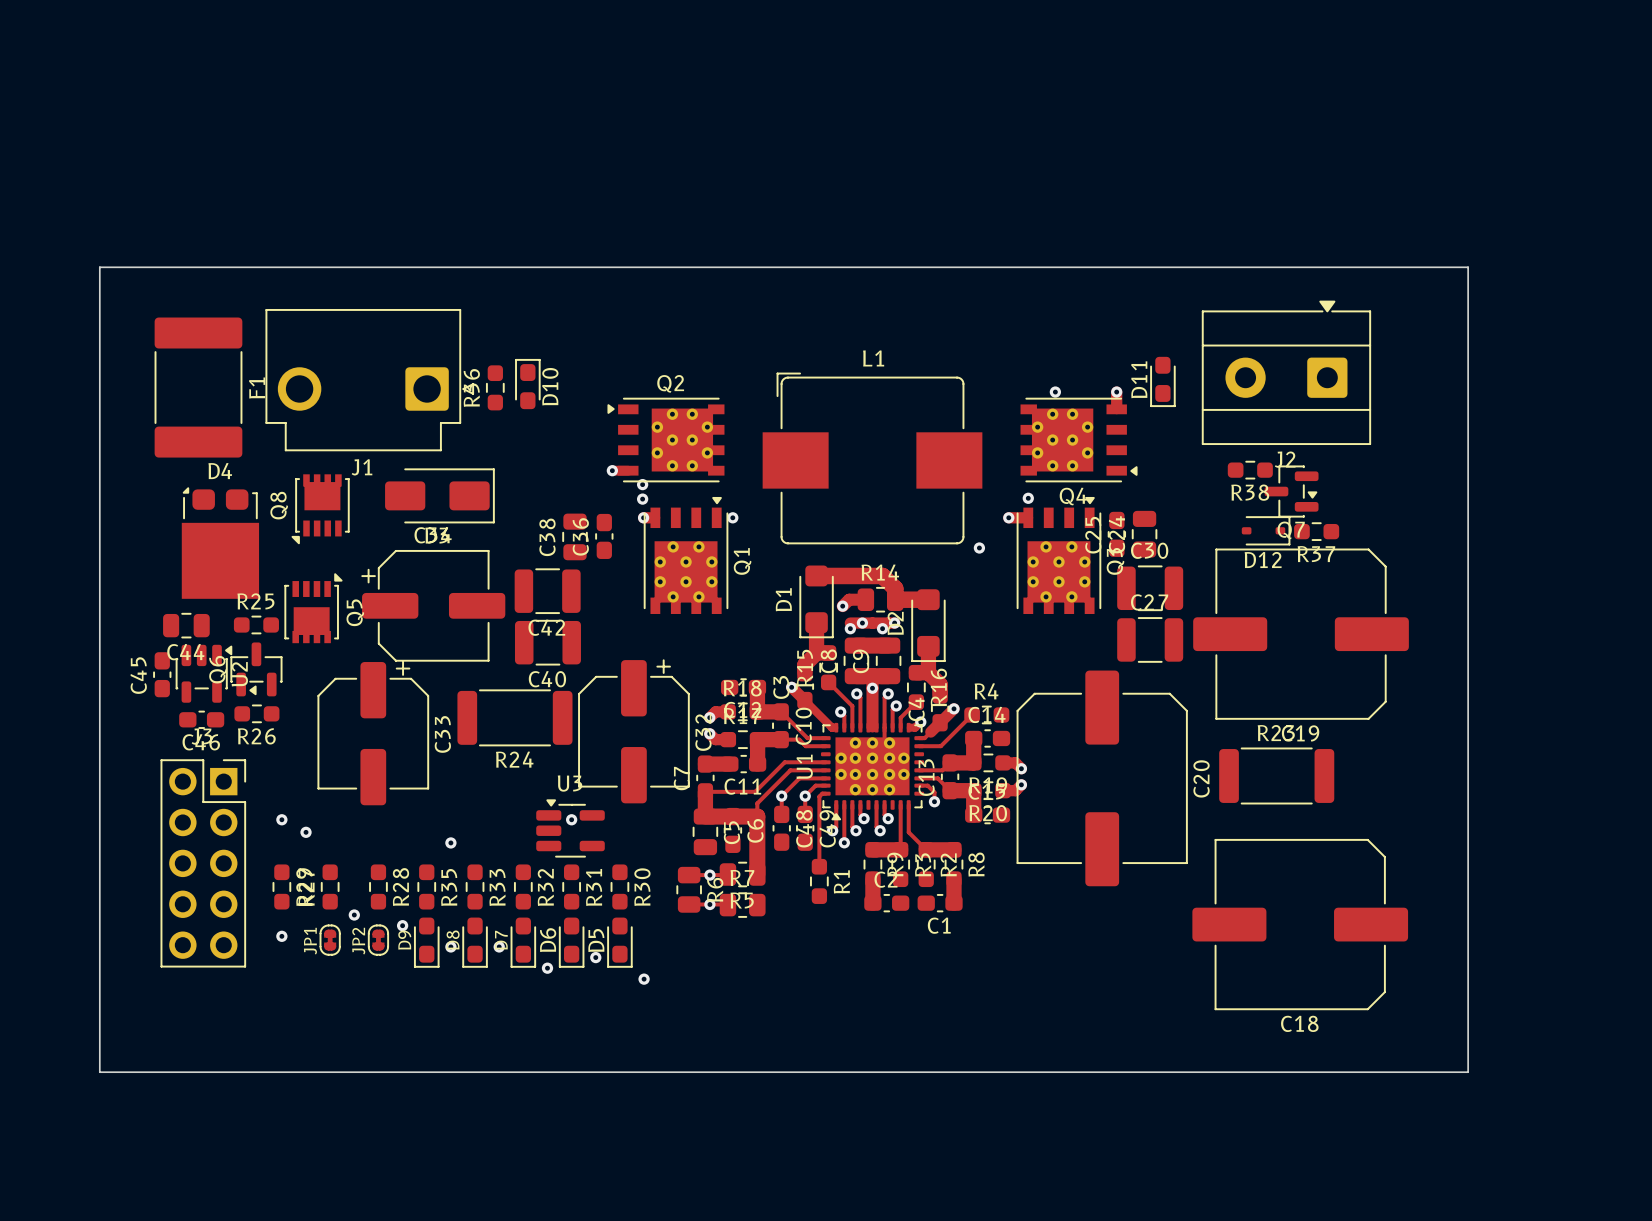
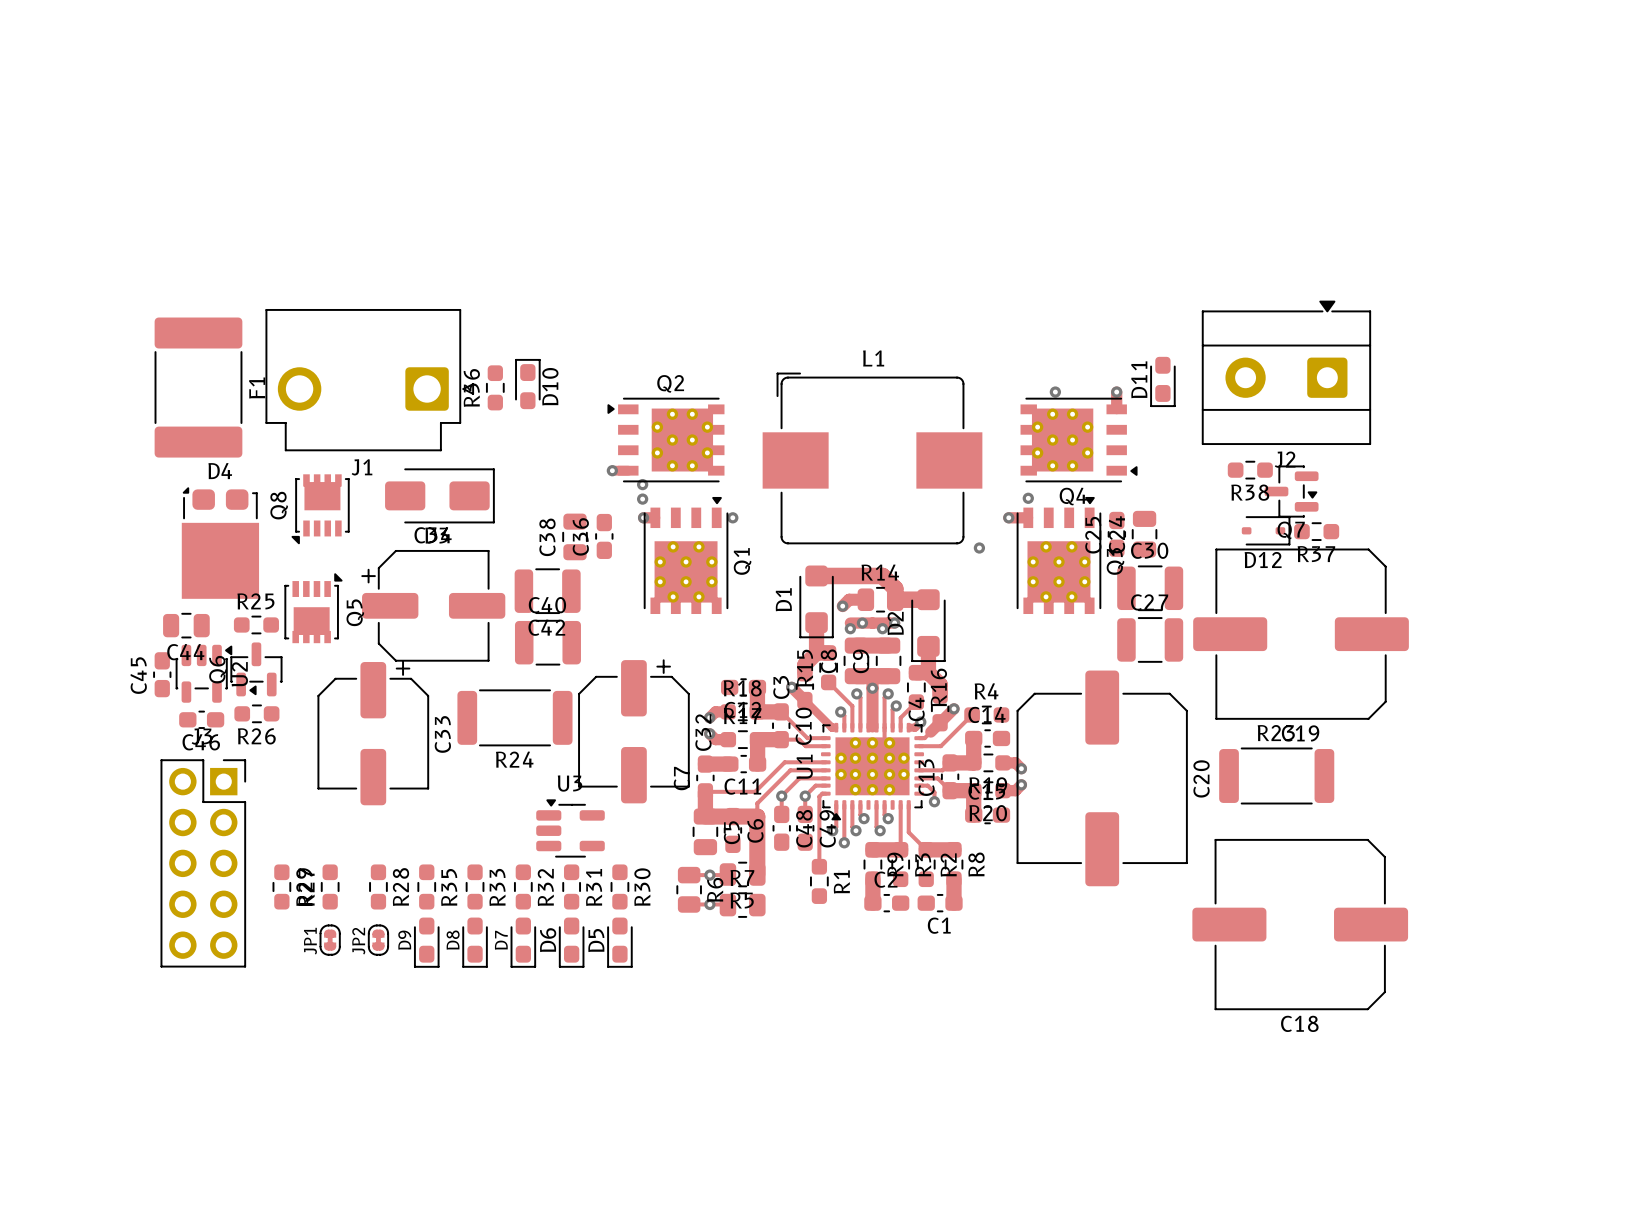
board edge: (99, 267) (1468, 267) (1468, 1072) (99, 1072) (99, 267) -> none
C40 name position: C40 (547, 679) -> C40 (547, 605)
via: (281, 819) -> none
via: (571, 819) -> none
via: (306, 832) -> none
via: (450, 842) -> none
via: (354, 915) -> none
via: (402, 925) -> none
via: (281, 936) -> none
via: (450, 946) -> none
via: (499, 946) -> none
via: (595, 957) -> none
via: (547, 968) -> none
via: (644, 979) -> none

